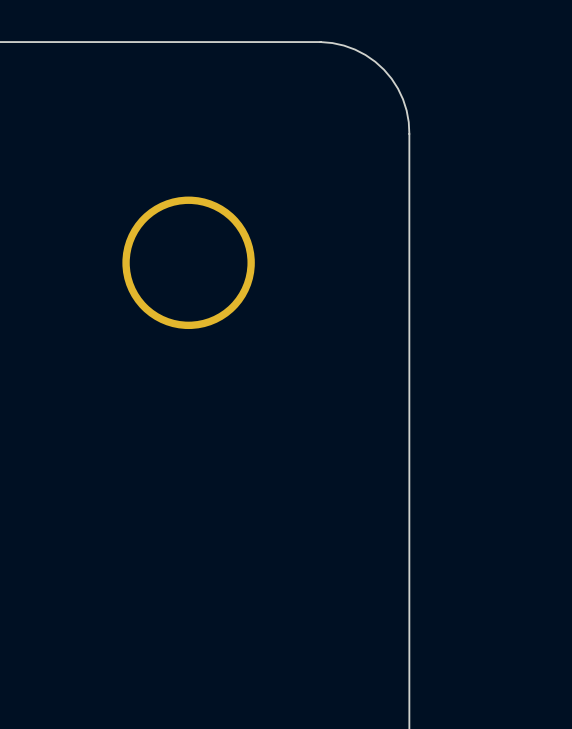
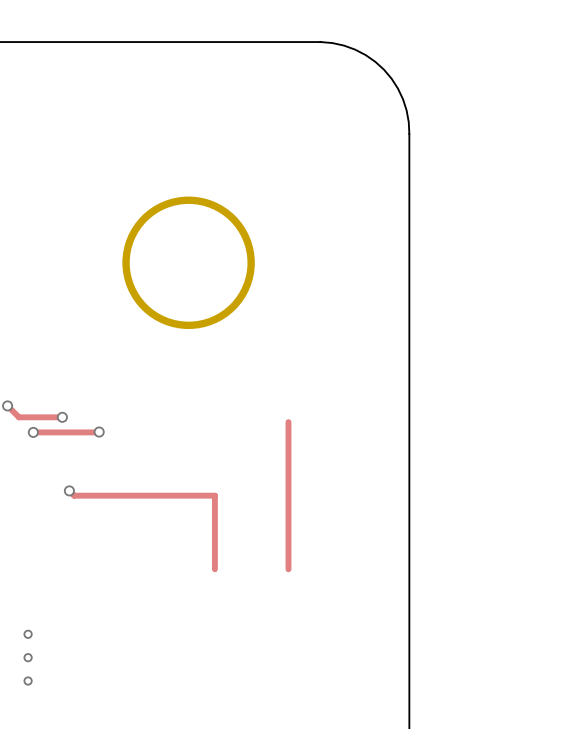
top track: none -> (7, 405) (19, 417) (62, 417)
via: none -> (7, 405)
via: none -> (62, 417)
top track: none -> (288, 422) (288, 569)
top track: none -> (33, 432) (98, 432)
via: none -> (33, 432)
via: none -> (99, 432)
top track: none -> (69, 490) (74, 495) (214, 495) (214, 569)
via: none -> (69, 490)
via: none -> (28, 634)
via: none -> (28, 657)
via: none -> (28, 681)

